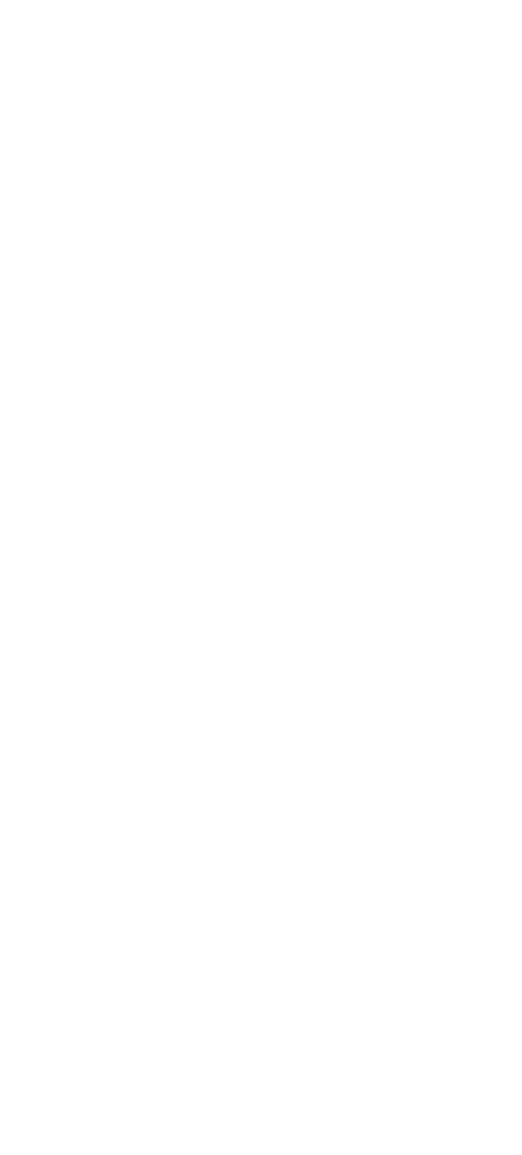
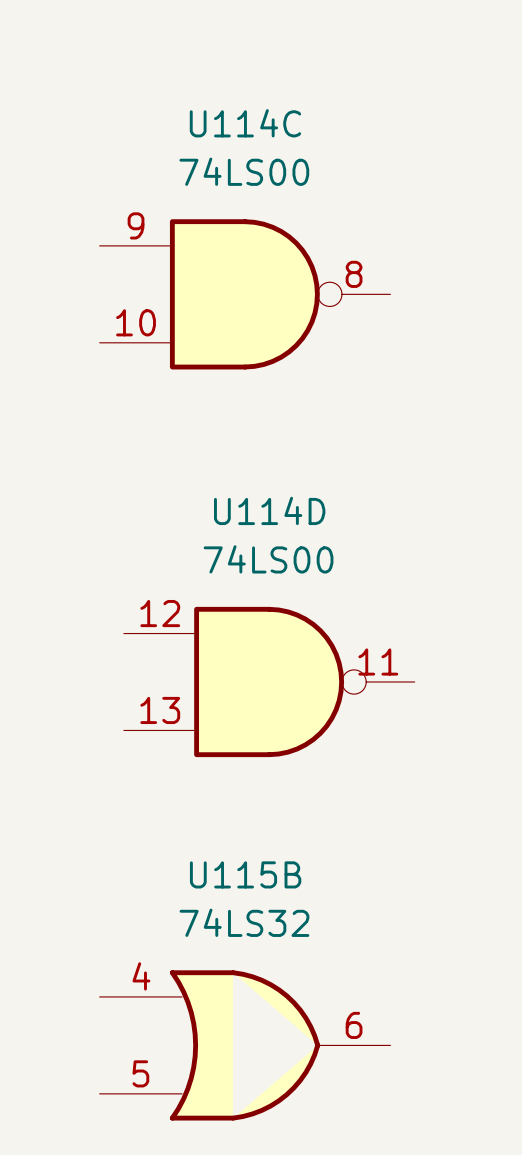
U114C: none -> 74LS00 (245, 294)
U114D: none -> 74LS00 (269, 681)
U115B: none -> 74LS32 (245, 1045)

